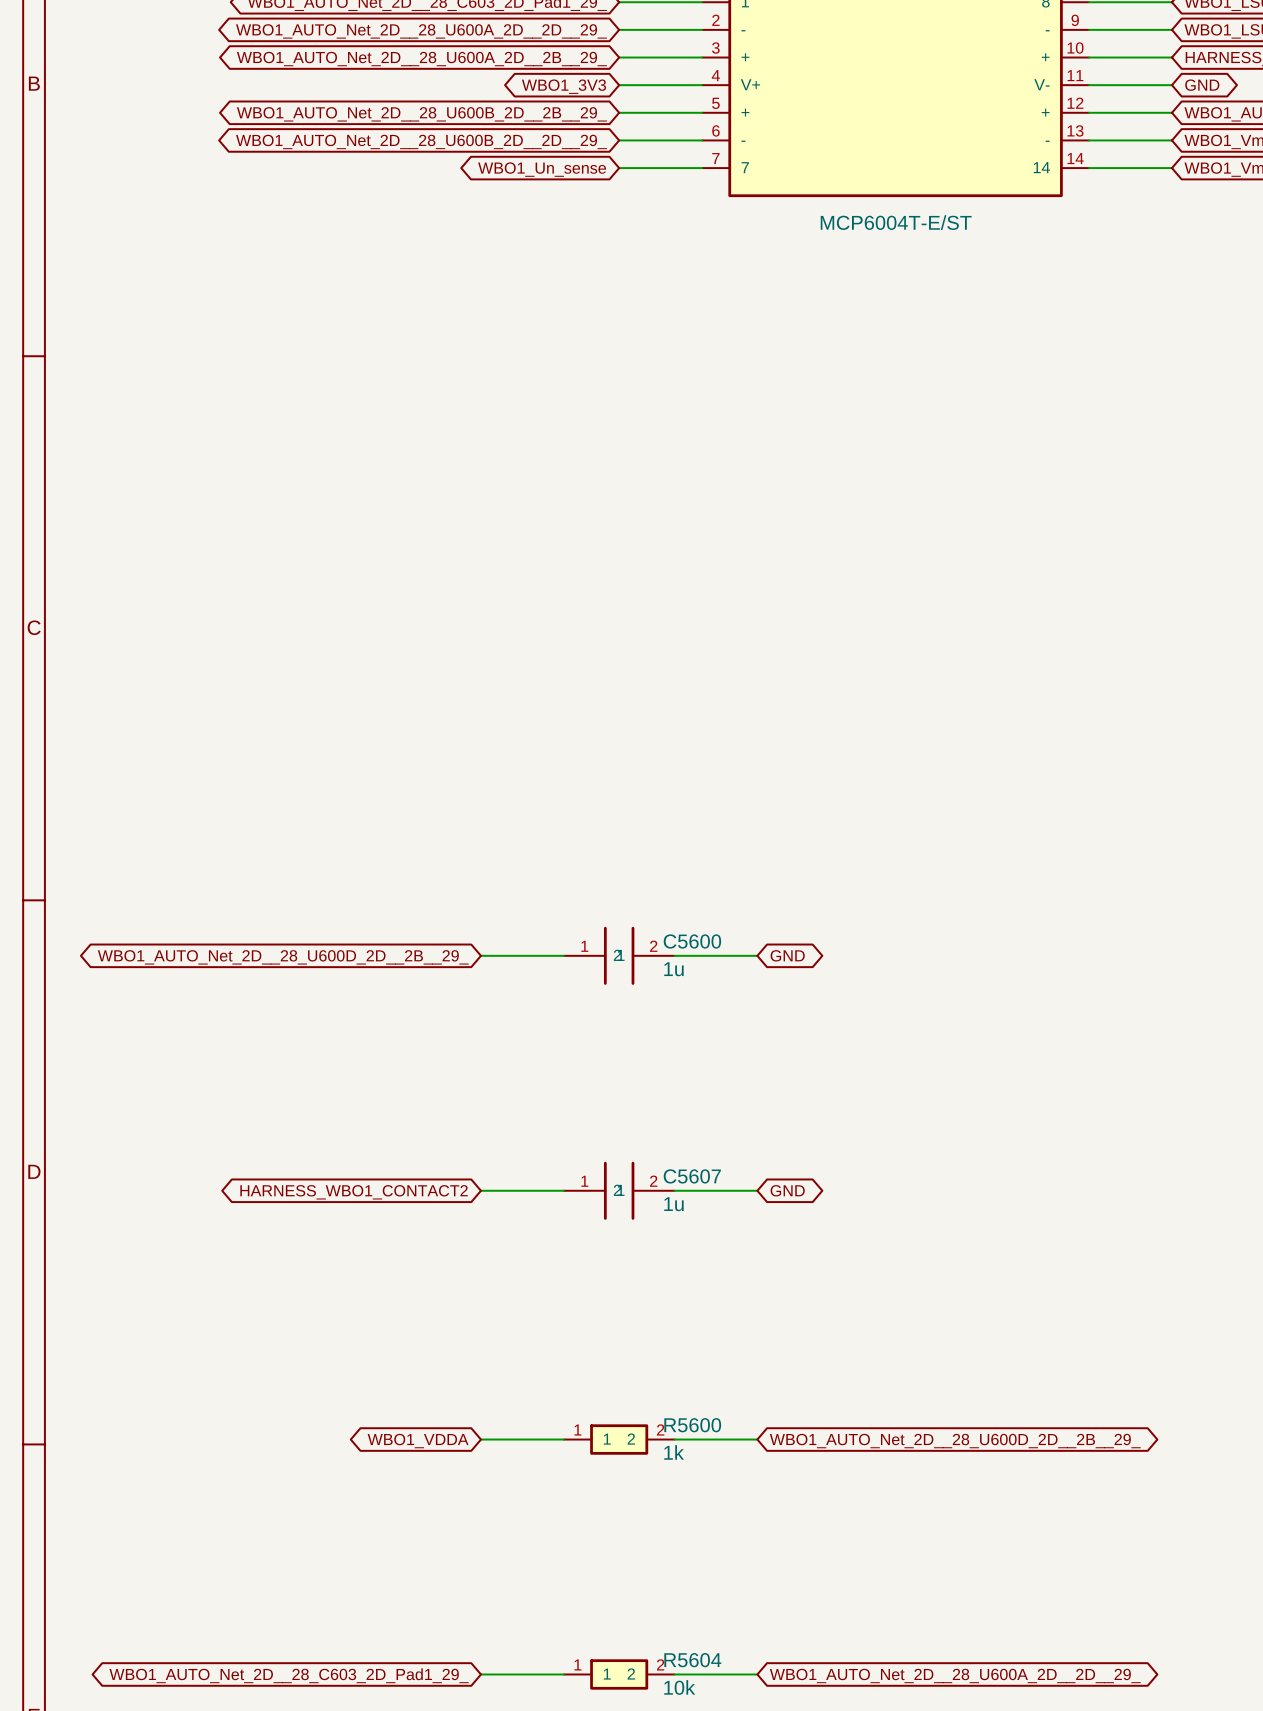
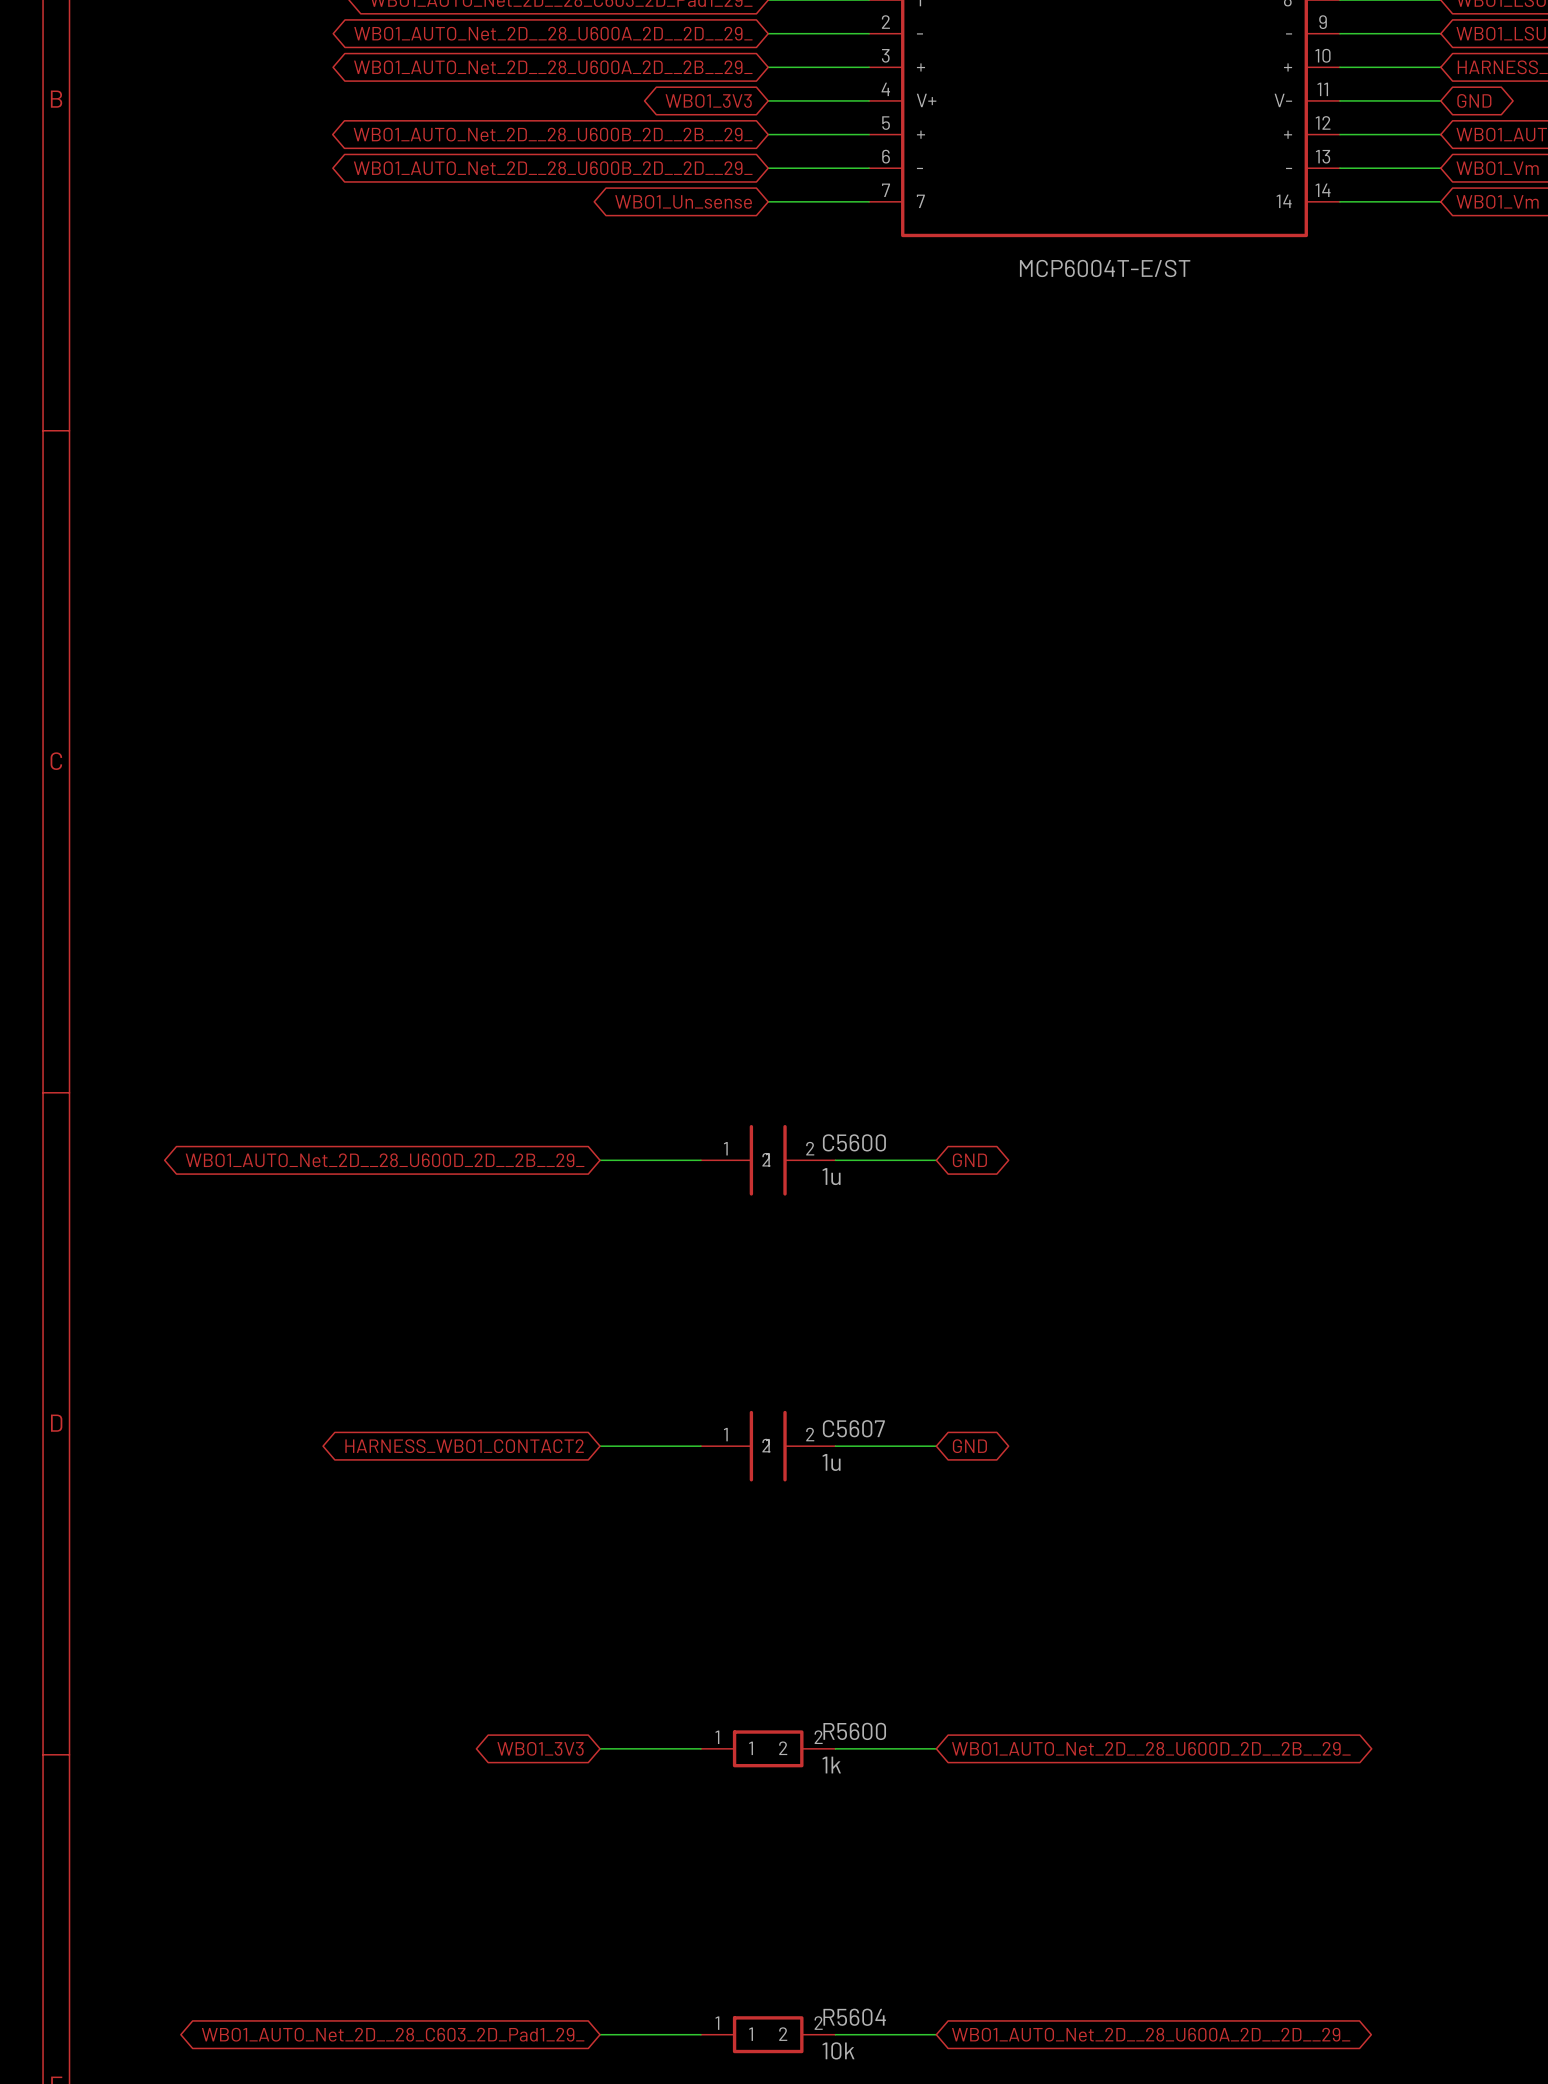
global label: WBO1_VDDA (418, 1441) -> WBO1_3V3 (540, 1748)

